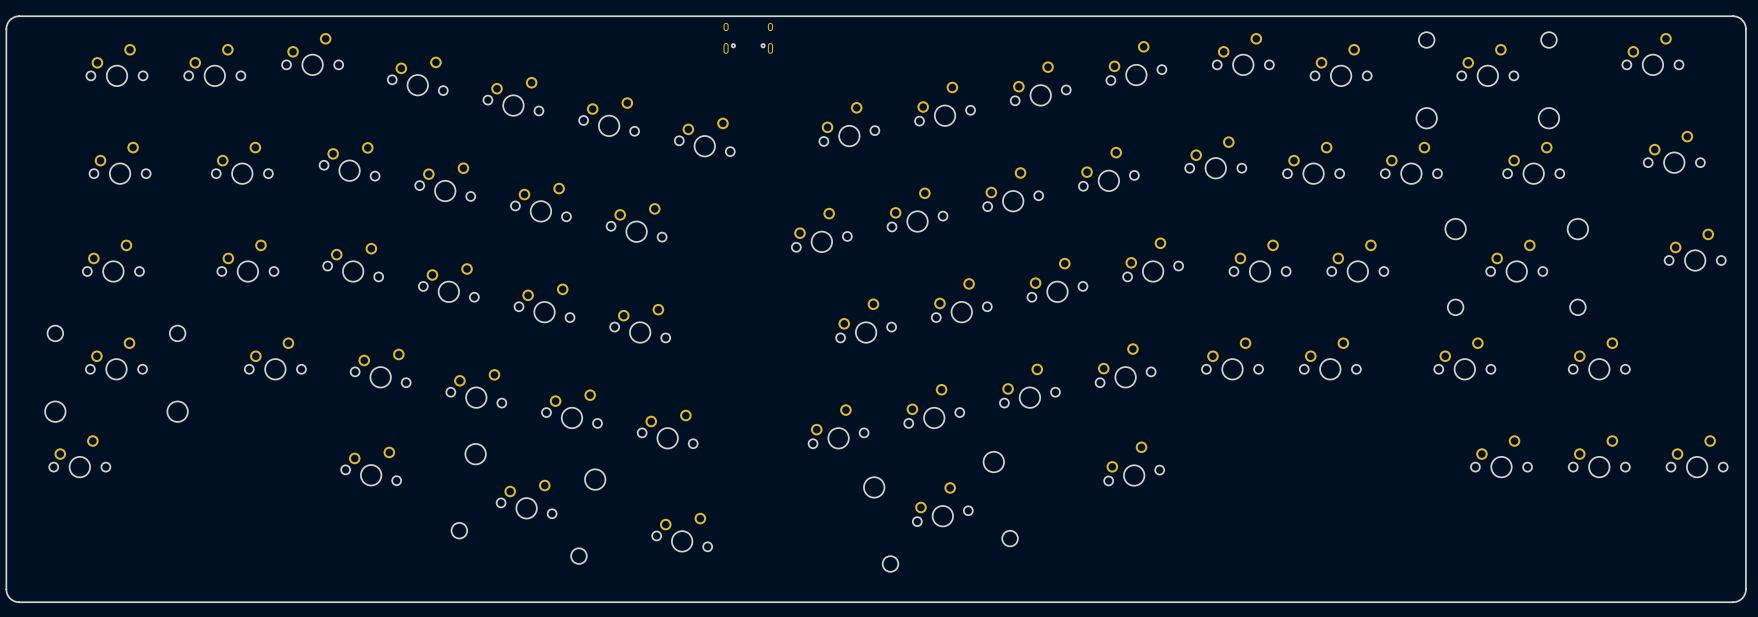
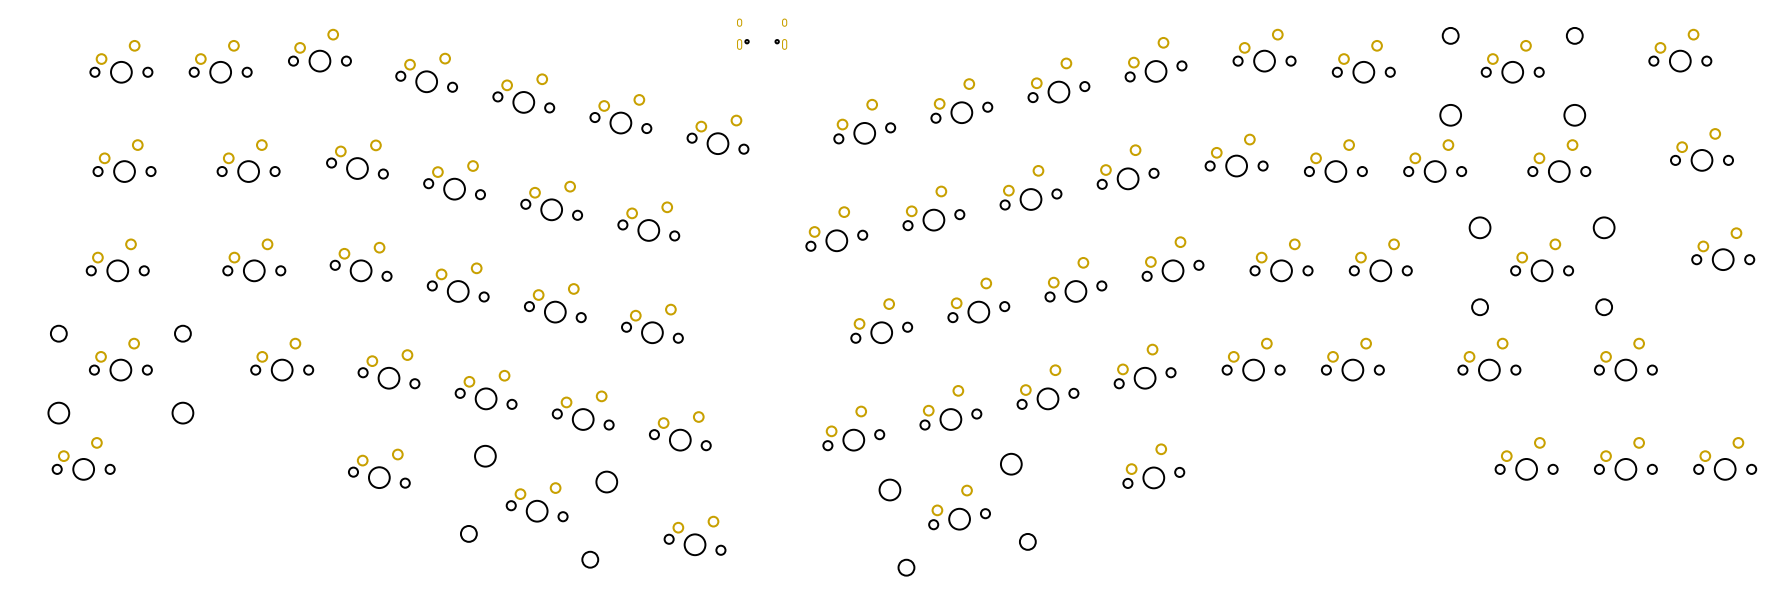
board edge: (19, 16) (1736, 16) (1743, 21) (1745, 29) (1745, 592) (1740, 599) (1733, 602) (15, 601) (9, 597) (6, 589) (6, 29) (10, 19) (19, 16) -> none

